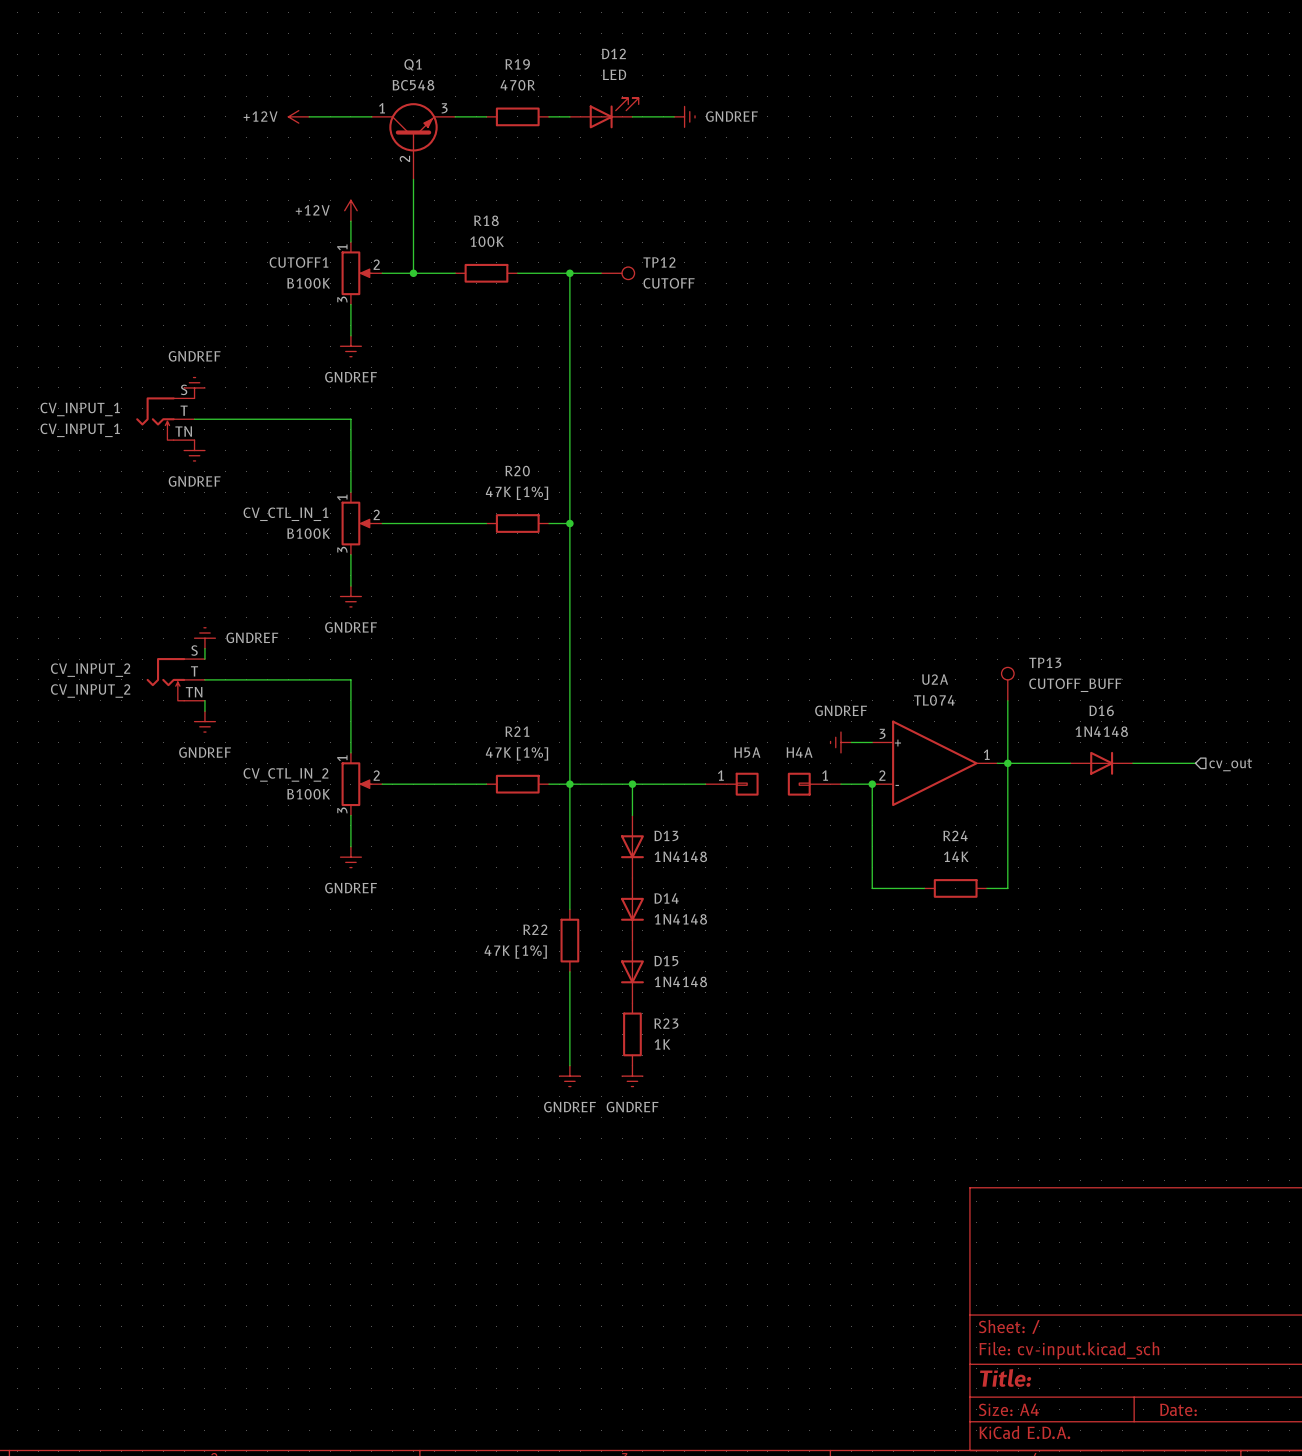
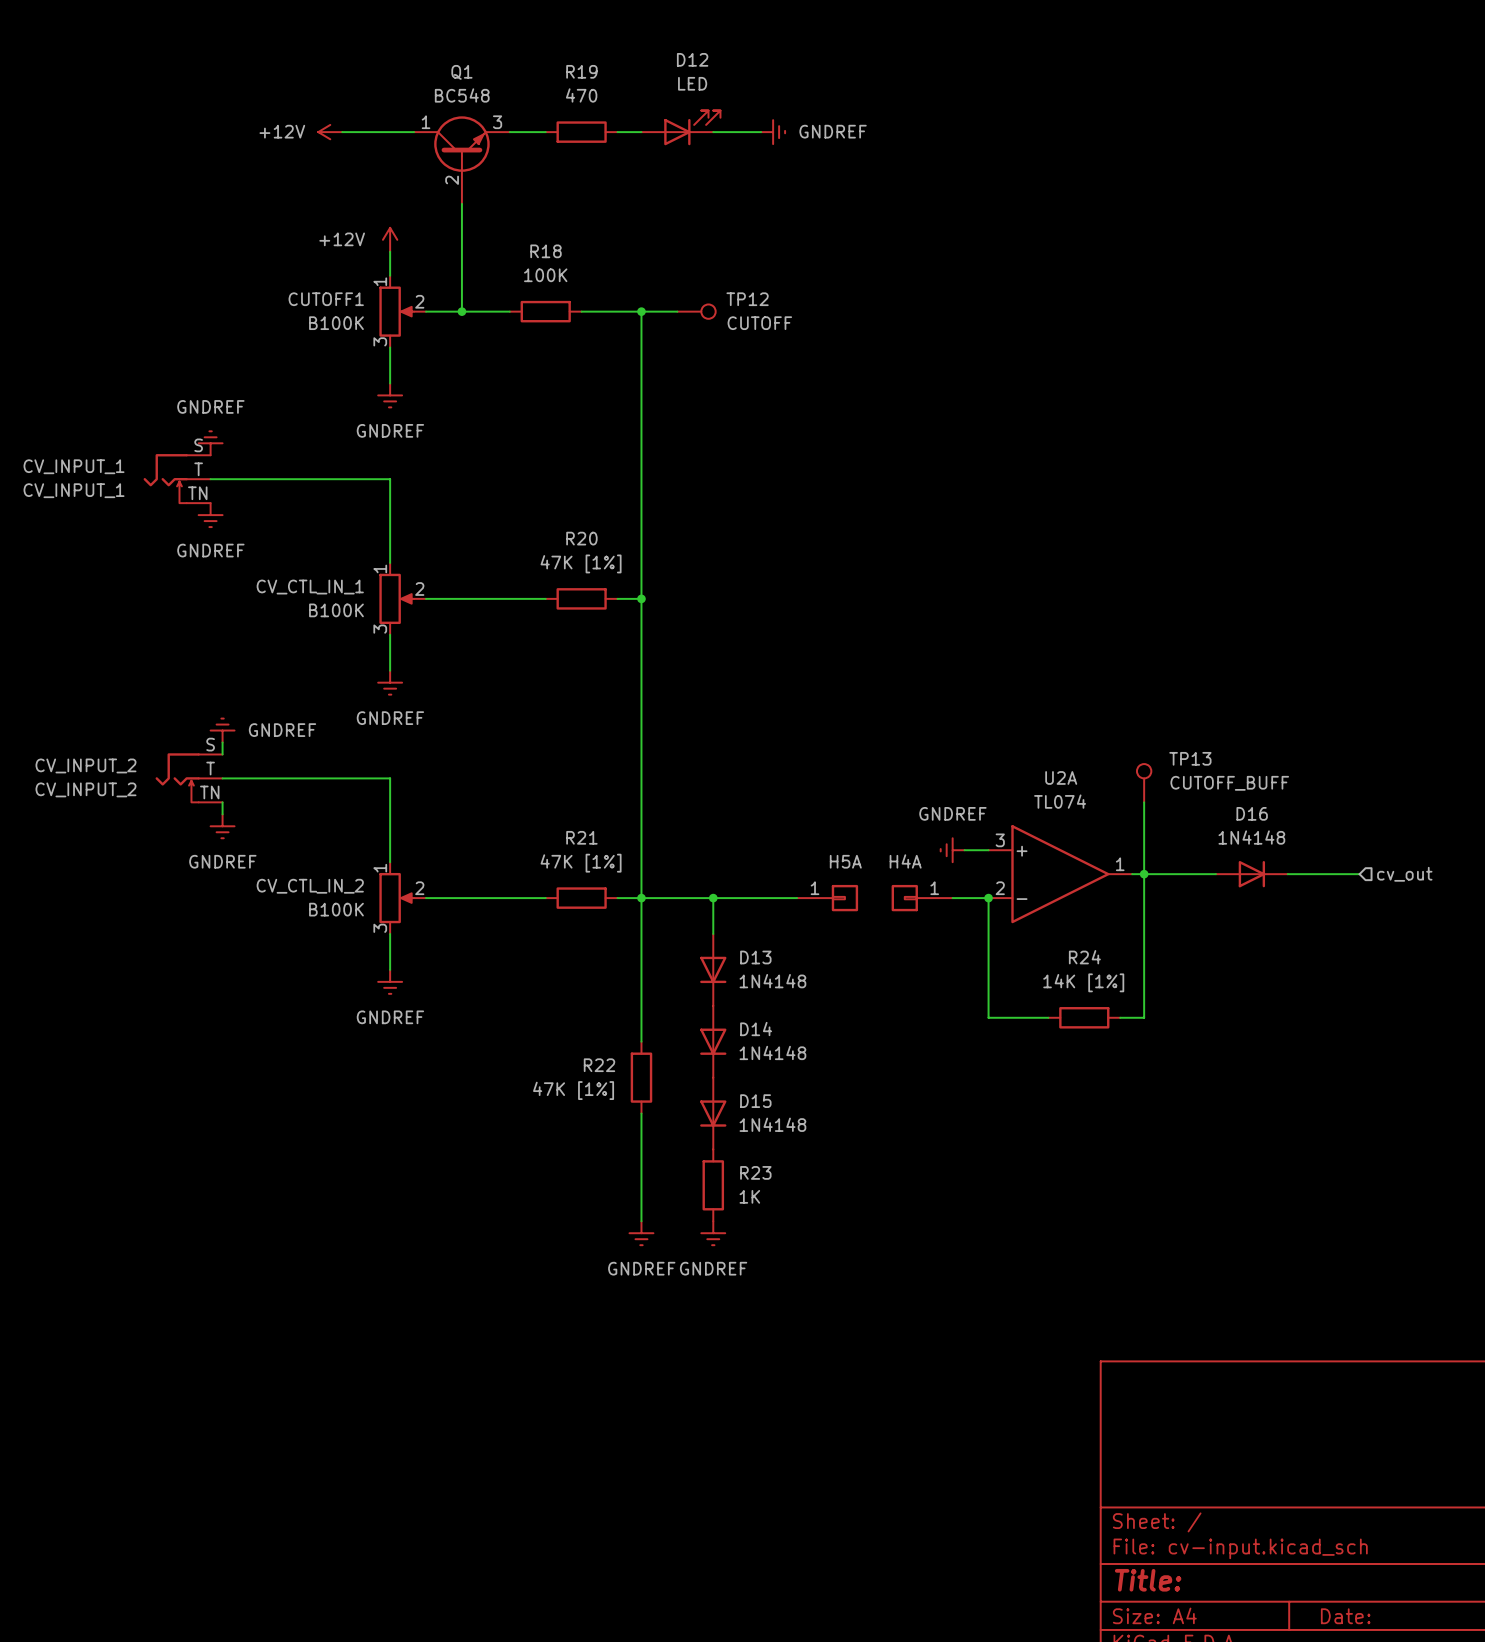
R19 value: 470R (517, 85) -> 470 (581, 95)
R24 value: 14K (956, 856) -> 14K [1%] (1083, 982)

